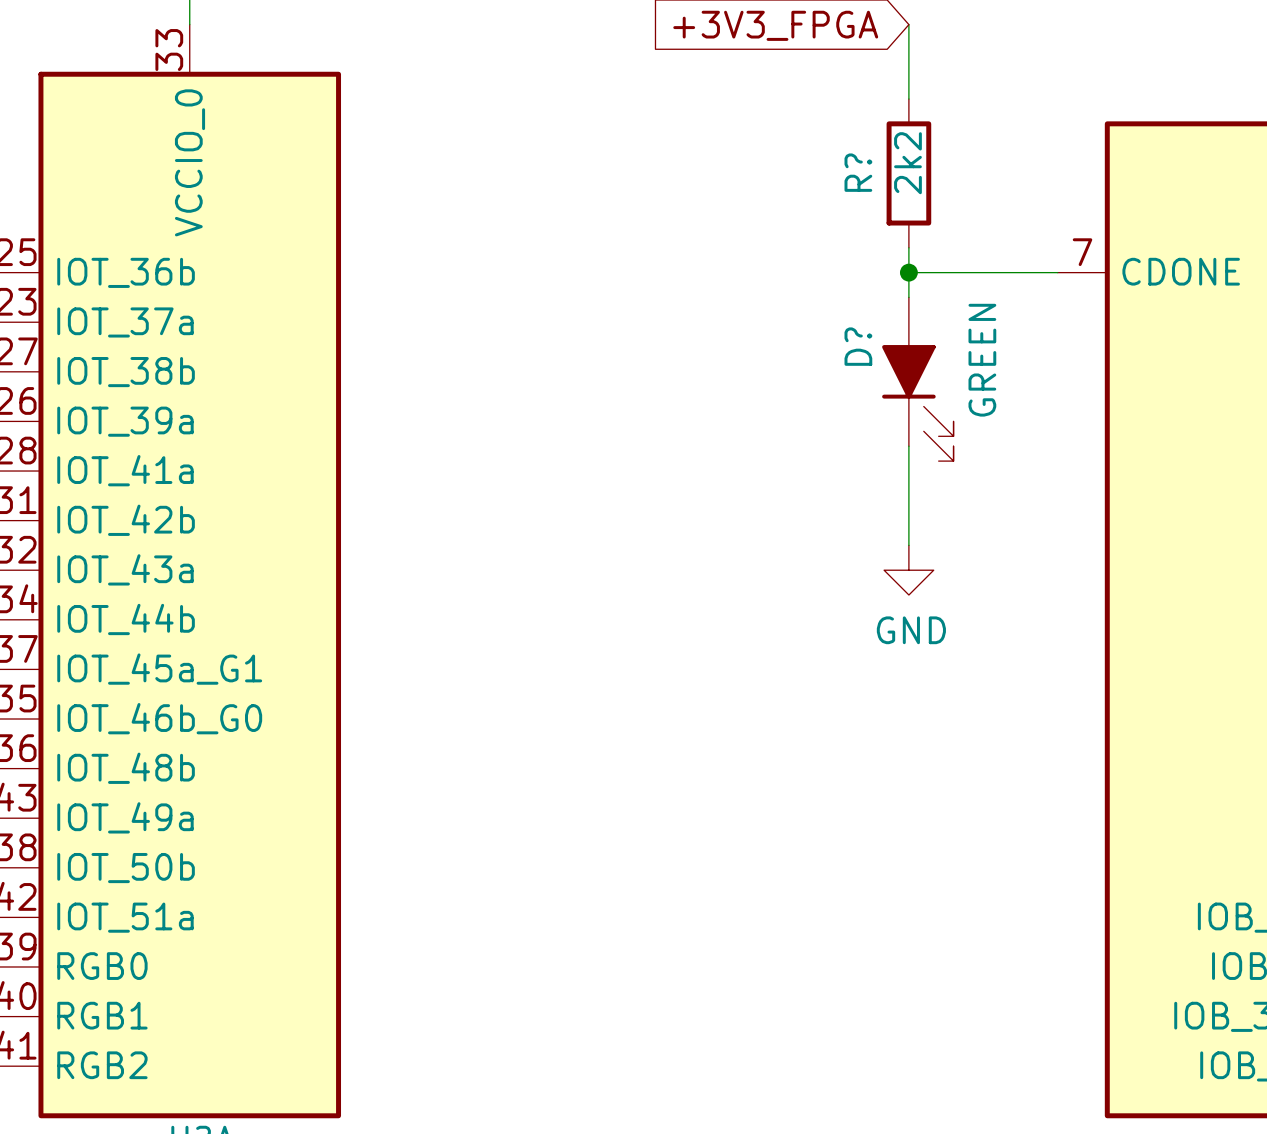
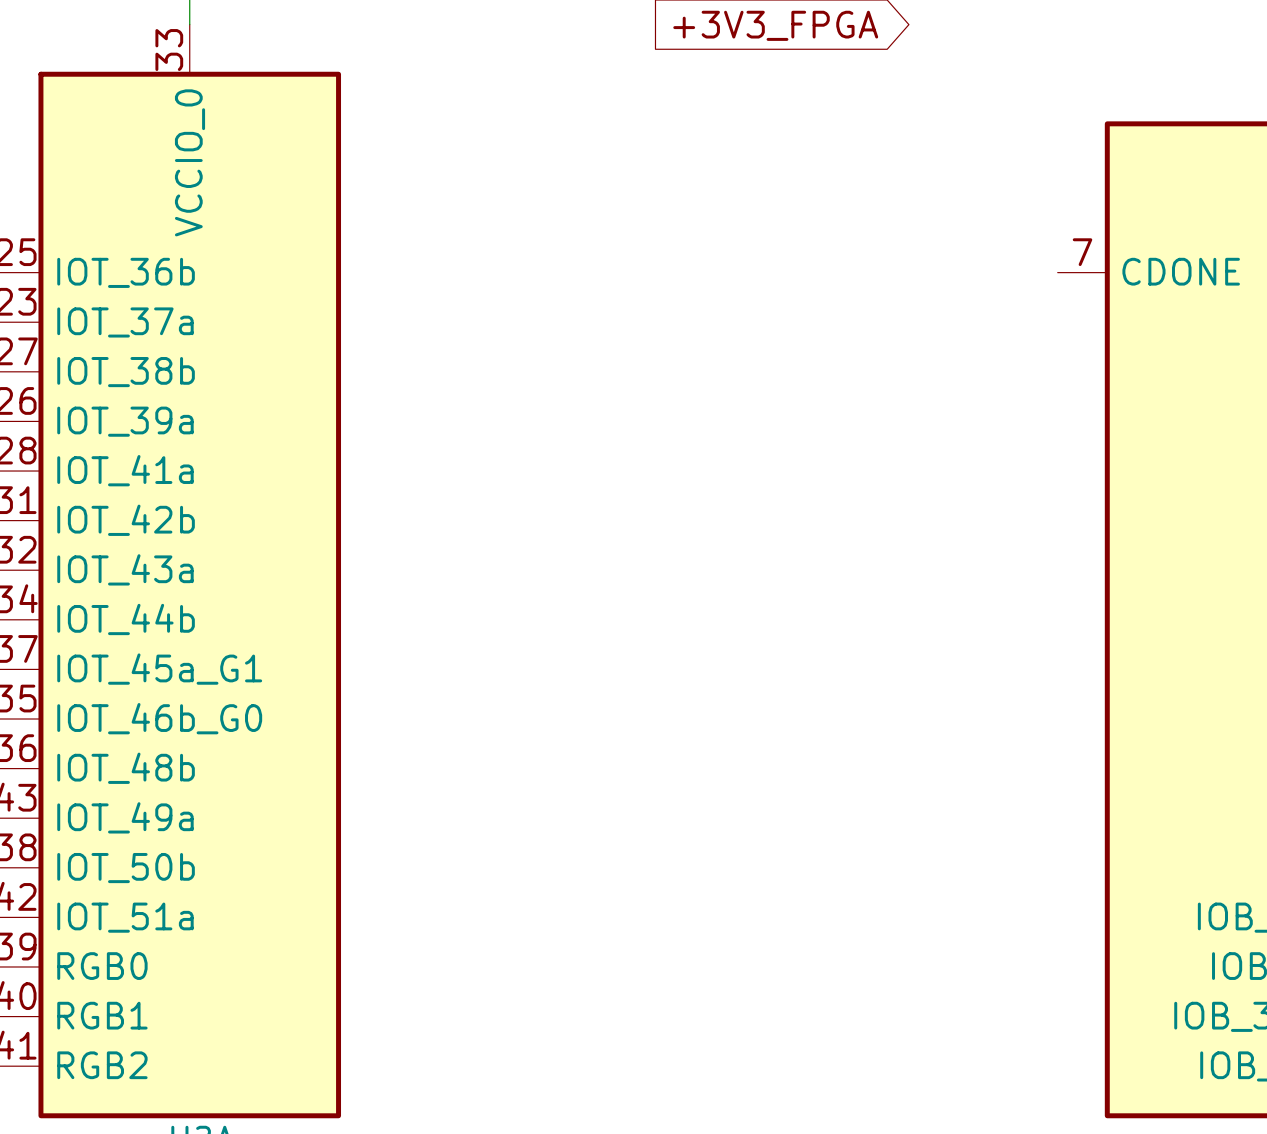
wire: (908, 24) (908, 99) -> none
R?: 2k2 (908, 173) -> none
wire: (908, 247) (908, 297) -> none
wire: (908, 272) (1057, 272) -> none
junction: (908, 272) -> none
D?: GREEN (917, 379) -> none
wire: (908, 446) (908, 545) -> none
power symbol: GND (908, 570) -> none

